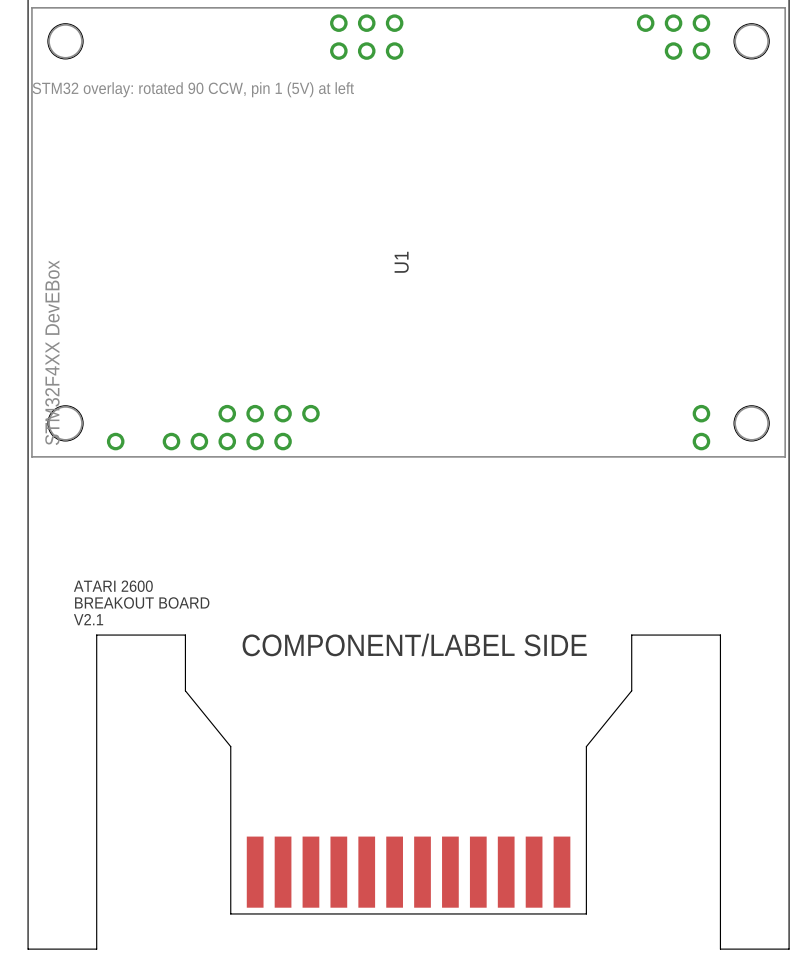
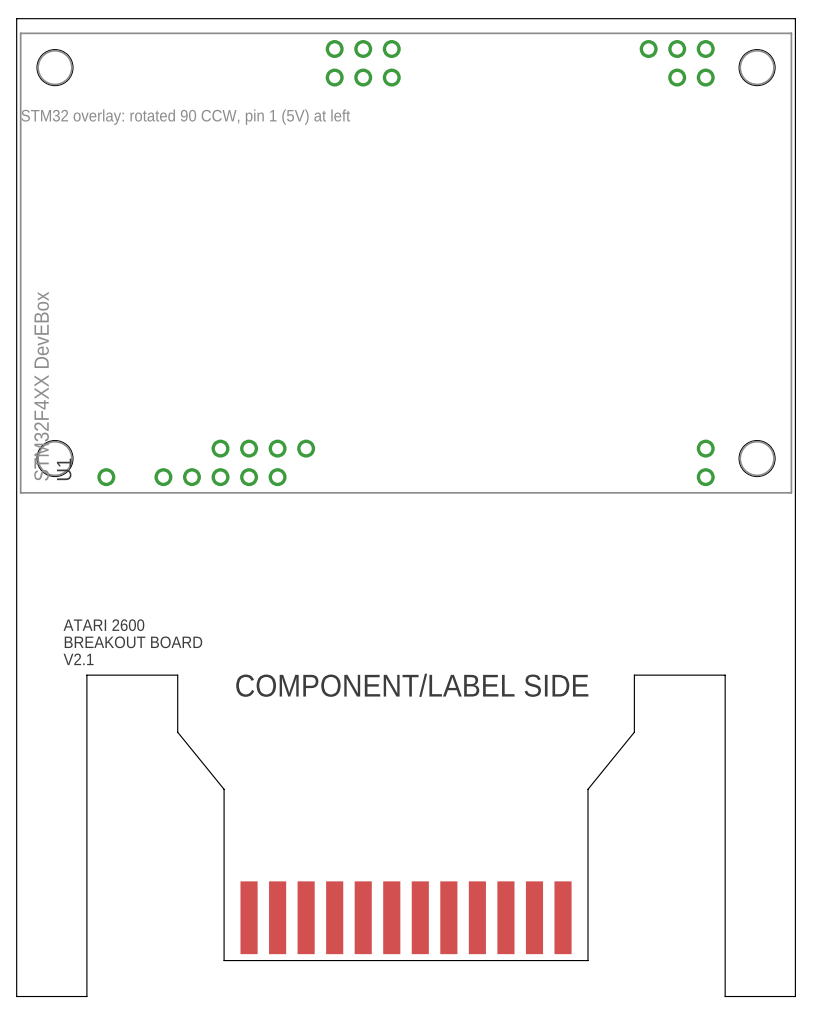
U1 name position: U1 (401, 262) -> U1 (64, 469)

